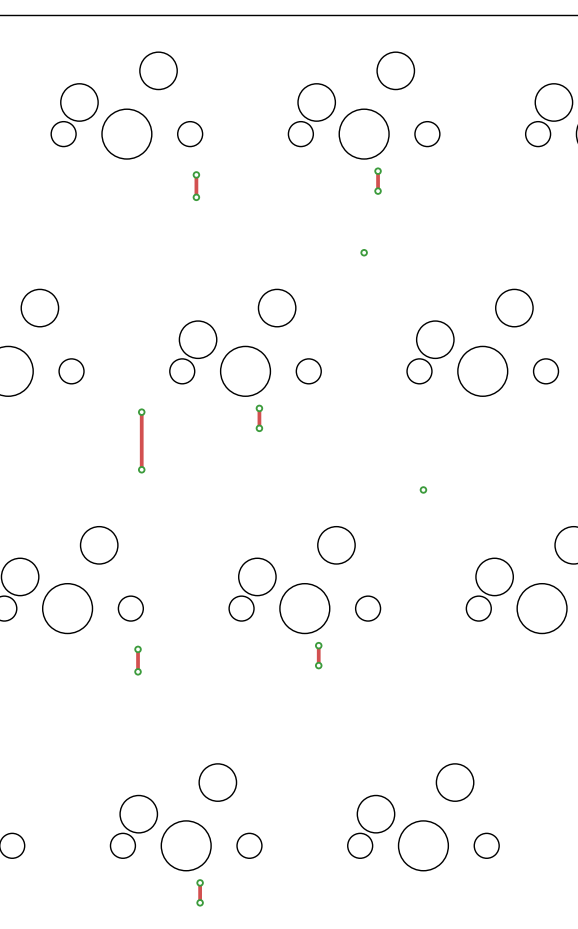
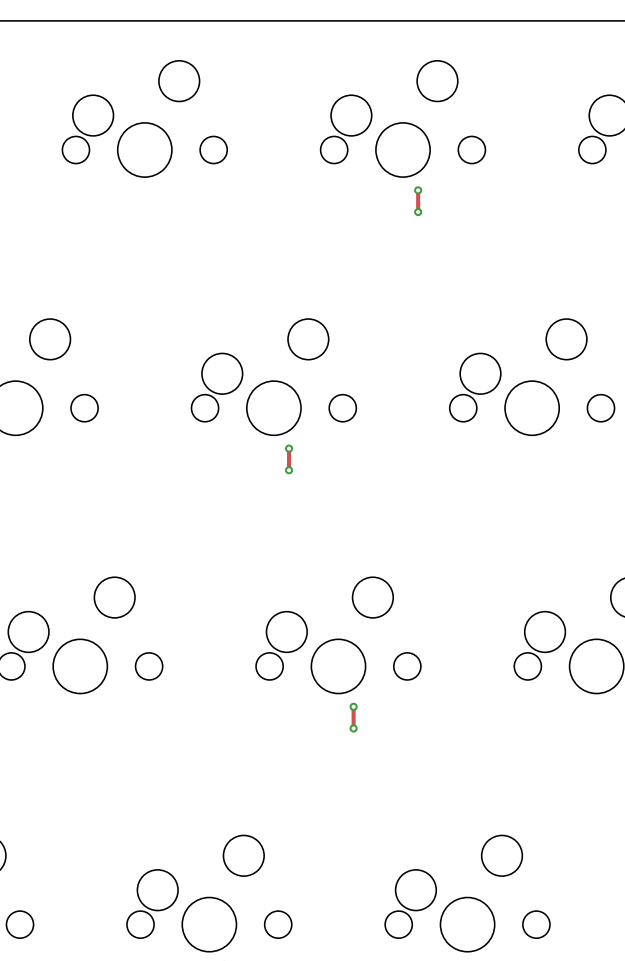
track: (196, 174) (196, 197) -> none
via: (196, 174) -> none
via: (196, 197) -> none
via: (364, 252) -> none
track: (141, 412) (141, 469) -> none
via: (141, 412) -> none
via: (141, 469) -> none
via: (423, 489) -> none
track: (138, 649) (138, 671) -> none
via: (138, 649) -> none
via: (138, 671) -> none

